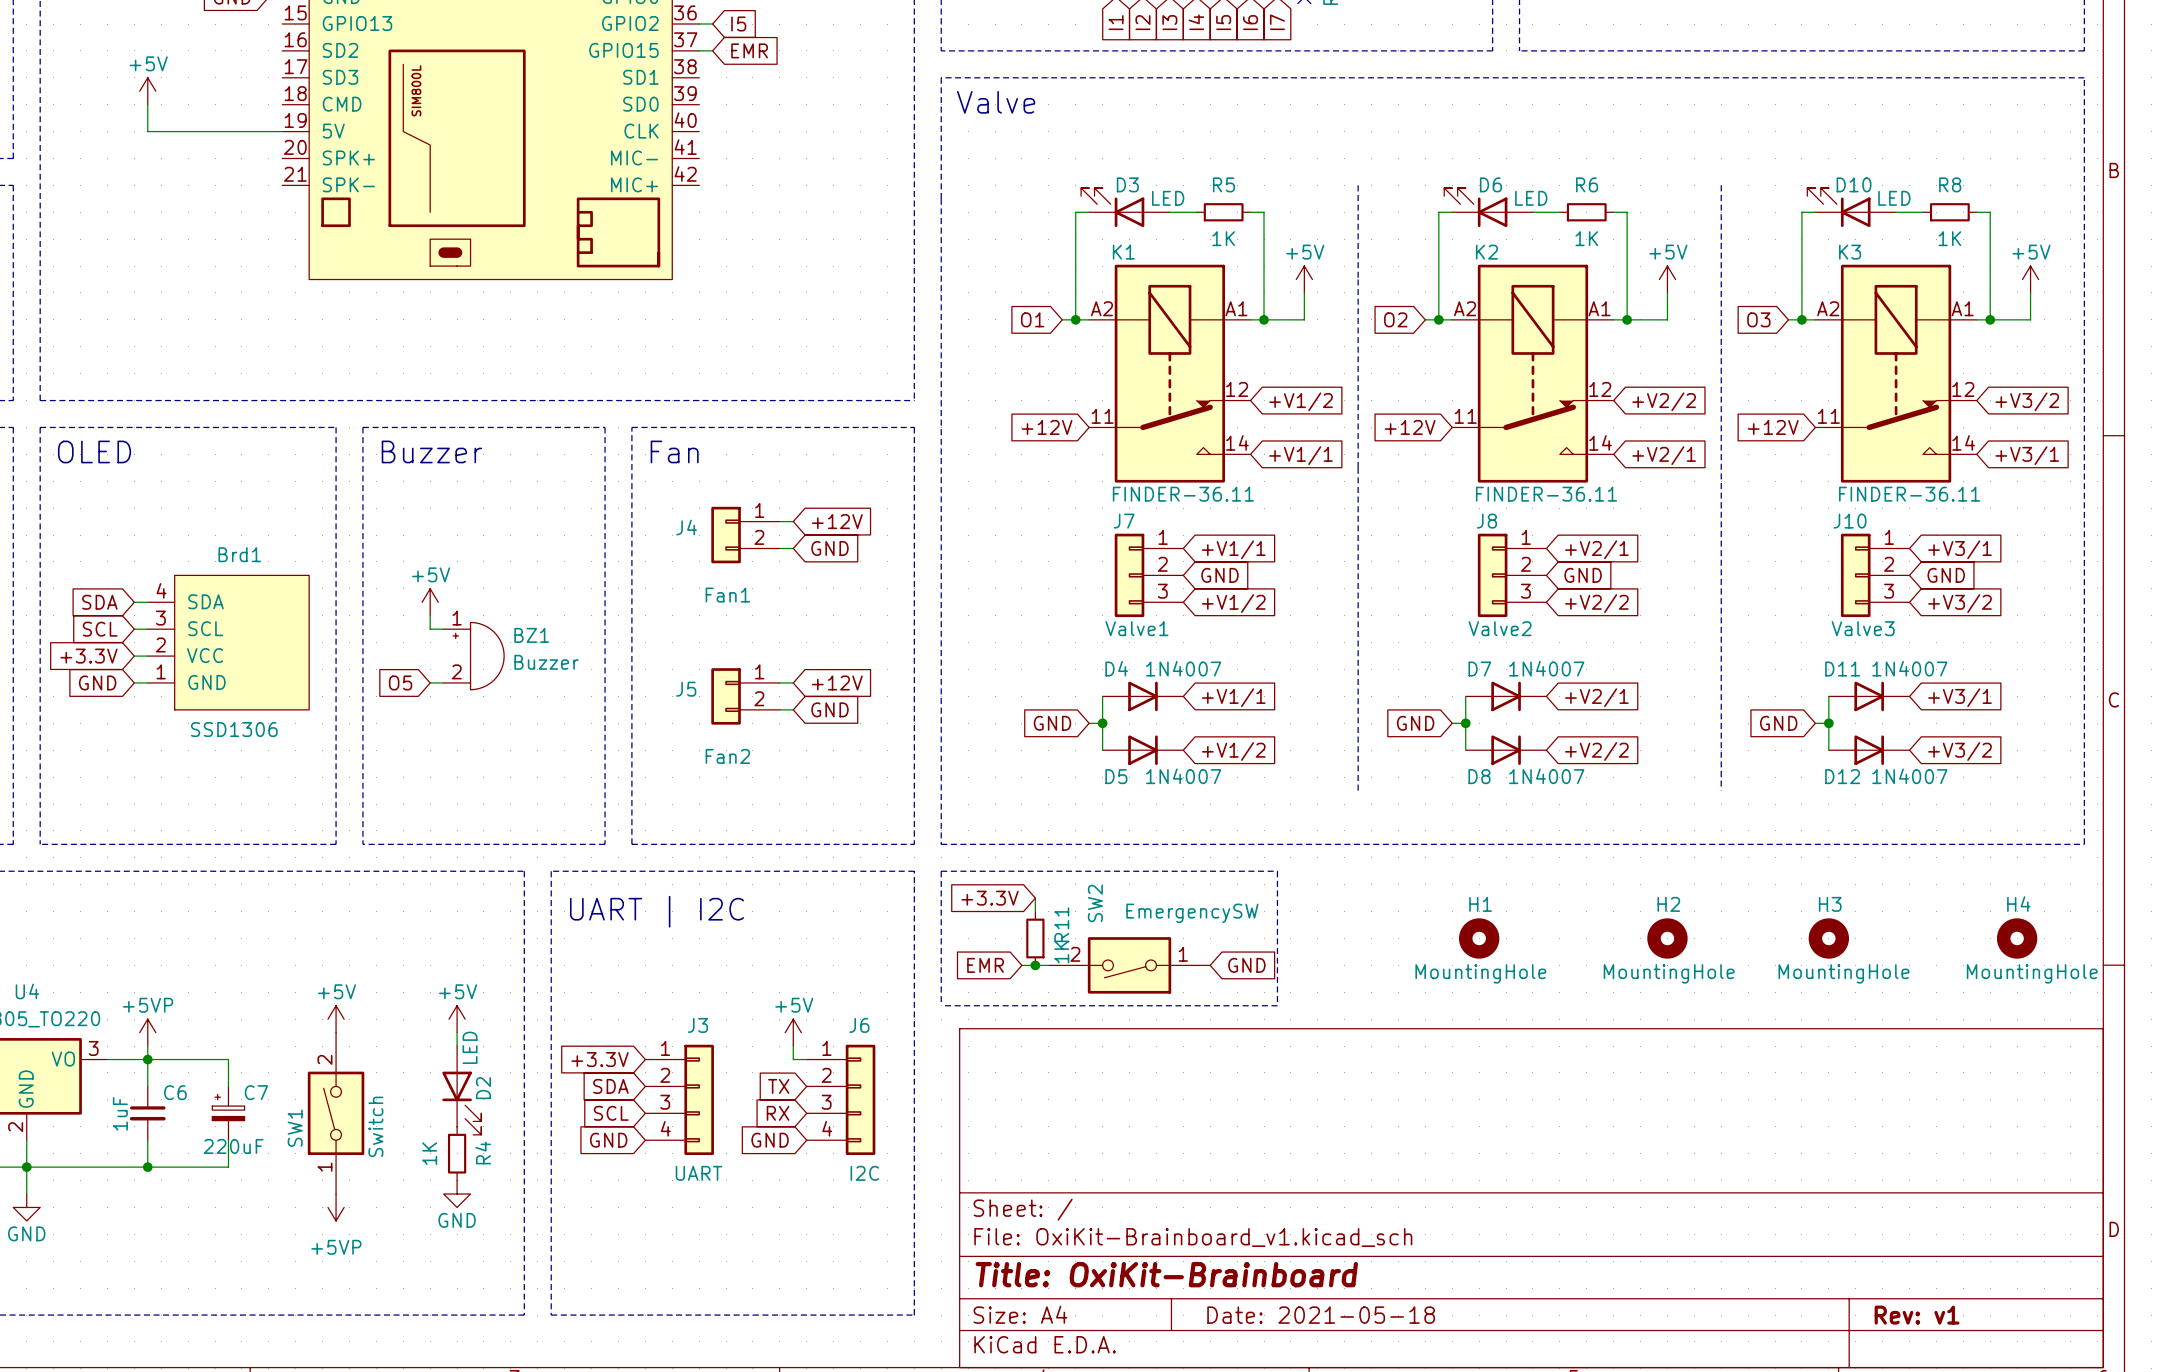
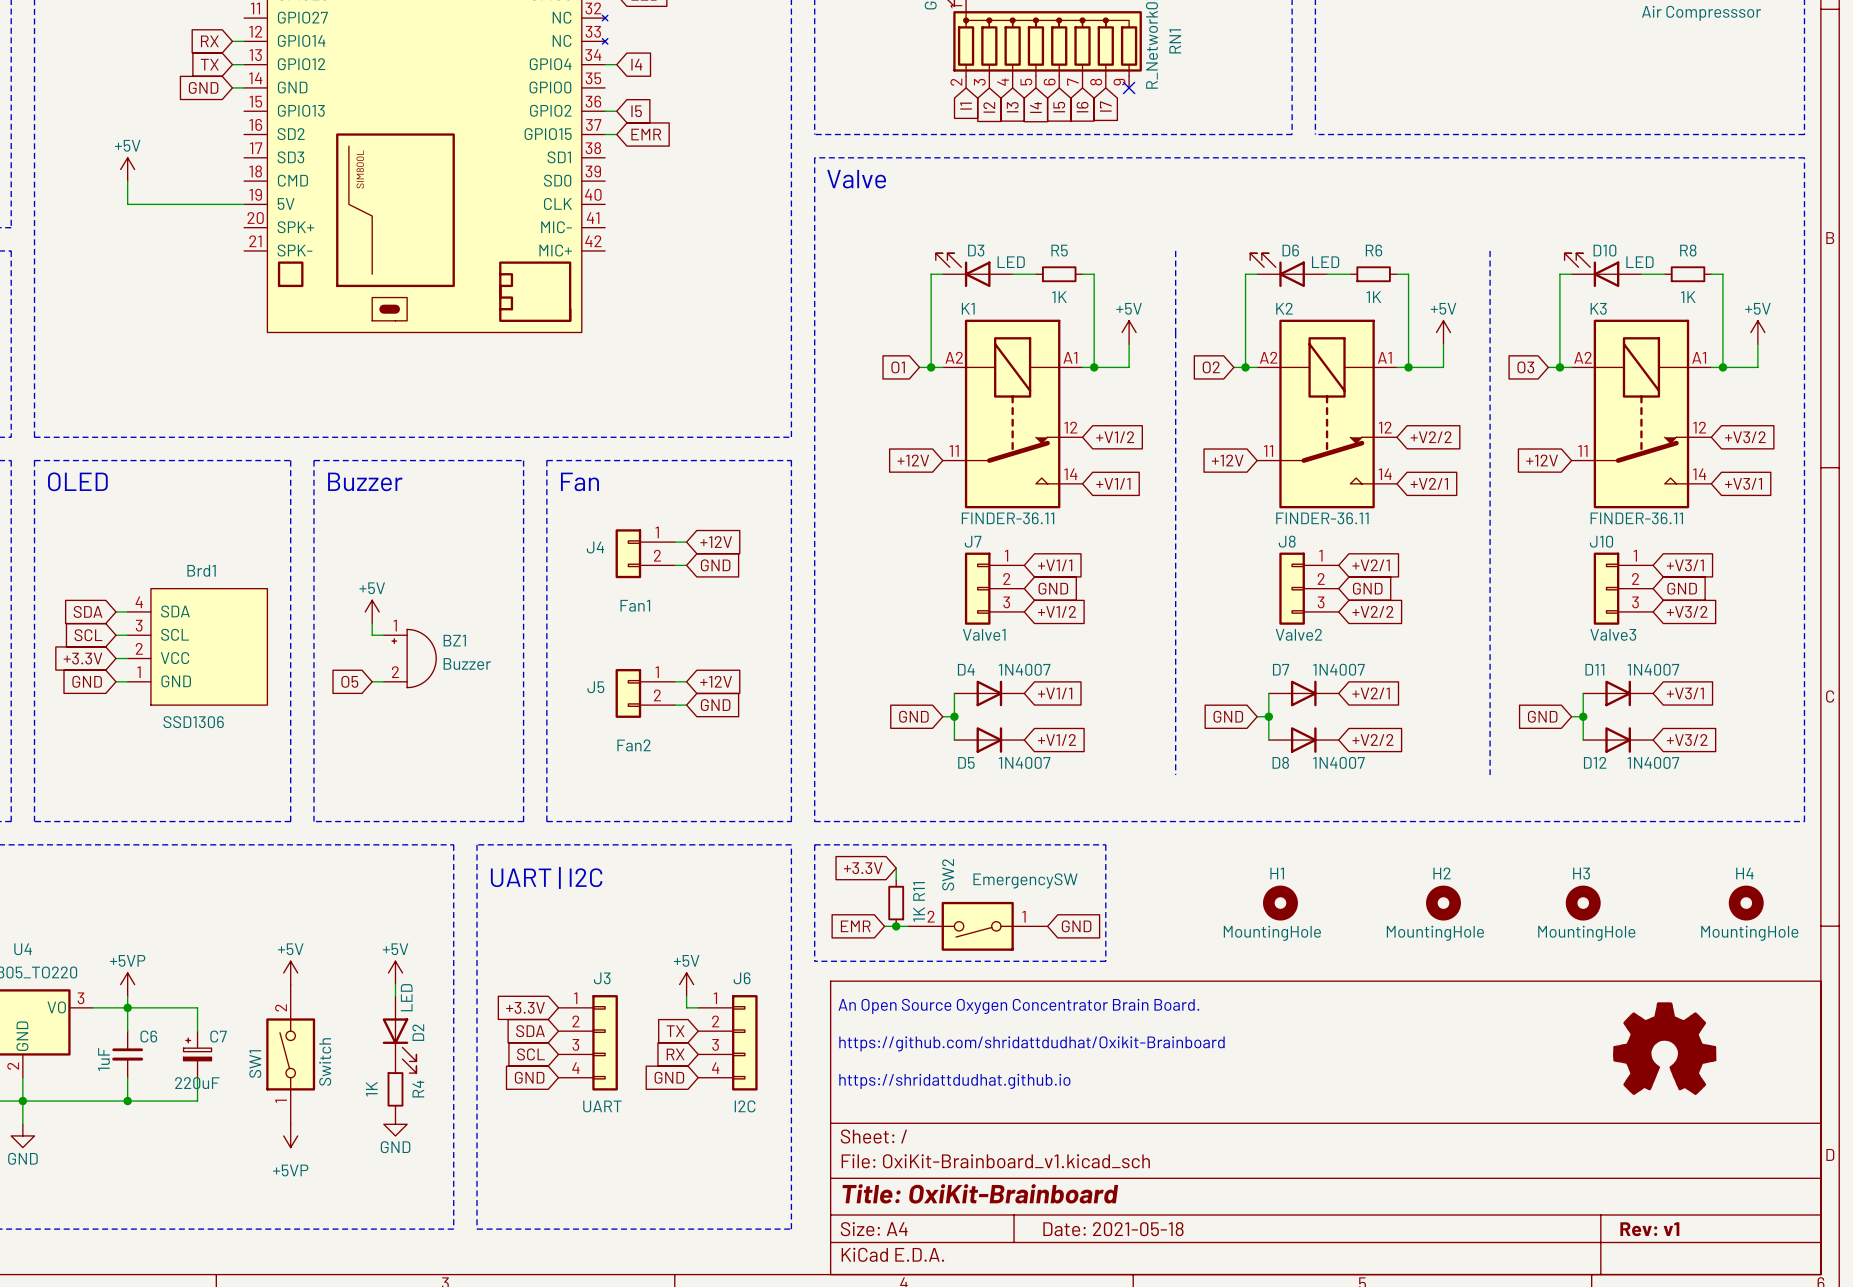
text: none -> An Open Source Oxygen Concentrator Brain Board. (1018, 1006)
text: none -> https://github.com/shridattdudhat/Oxikit-Brainboard (1031, 1043)
power symbol: none -> (1664, 1048)
text: none -> https://shridattdudhat.github.io (954, 1081)

